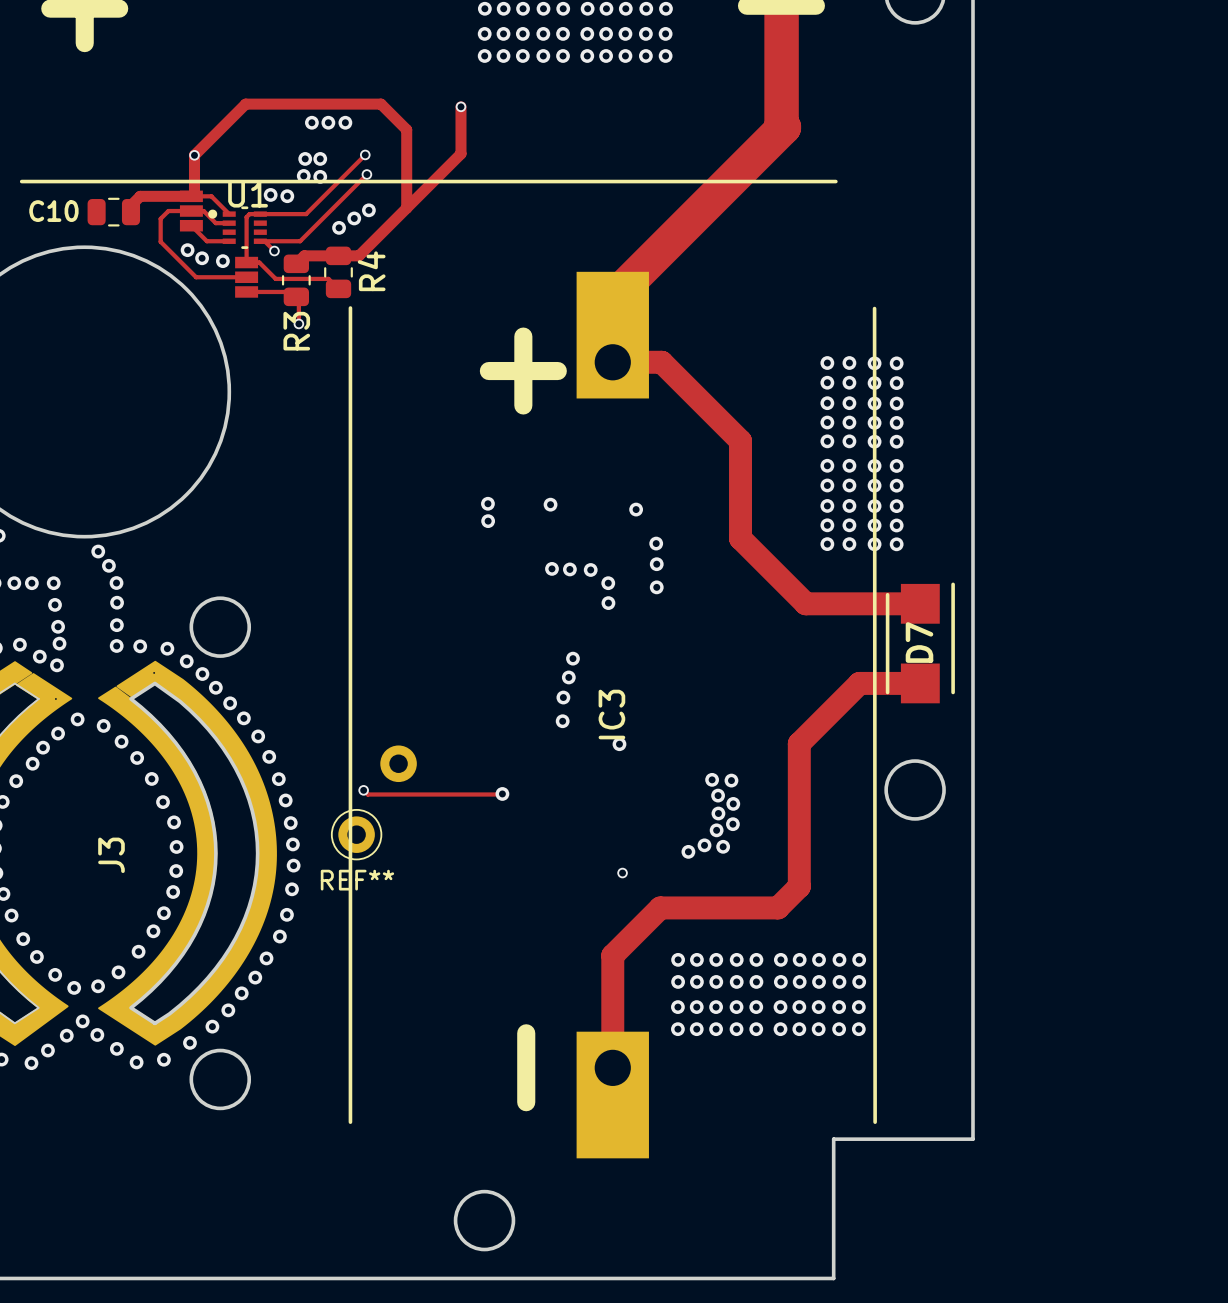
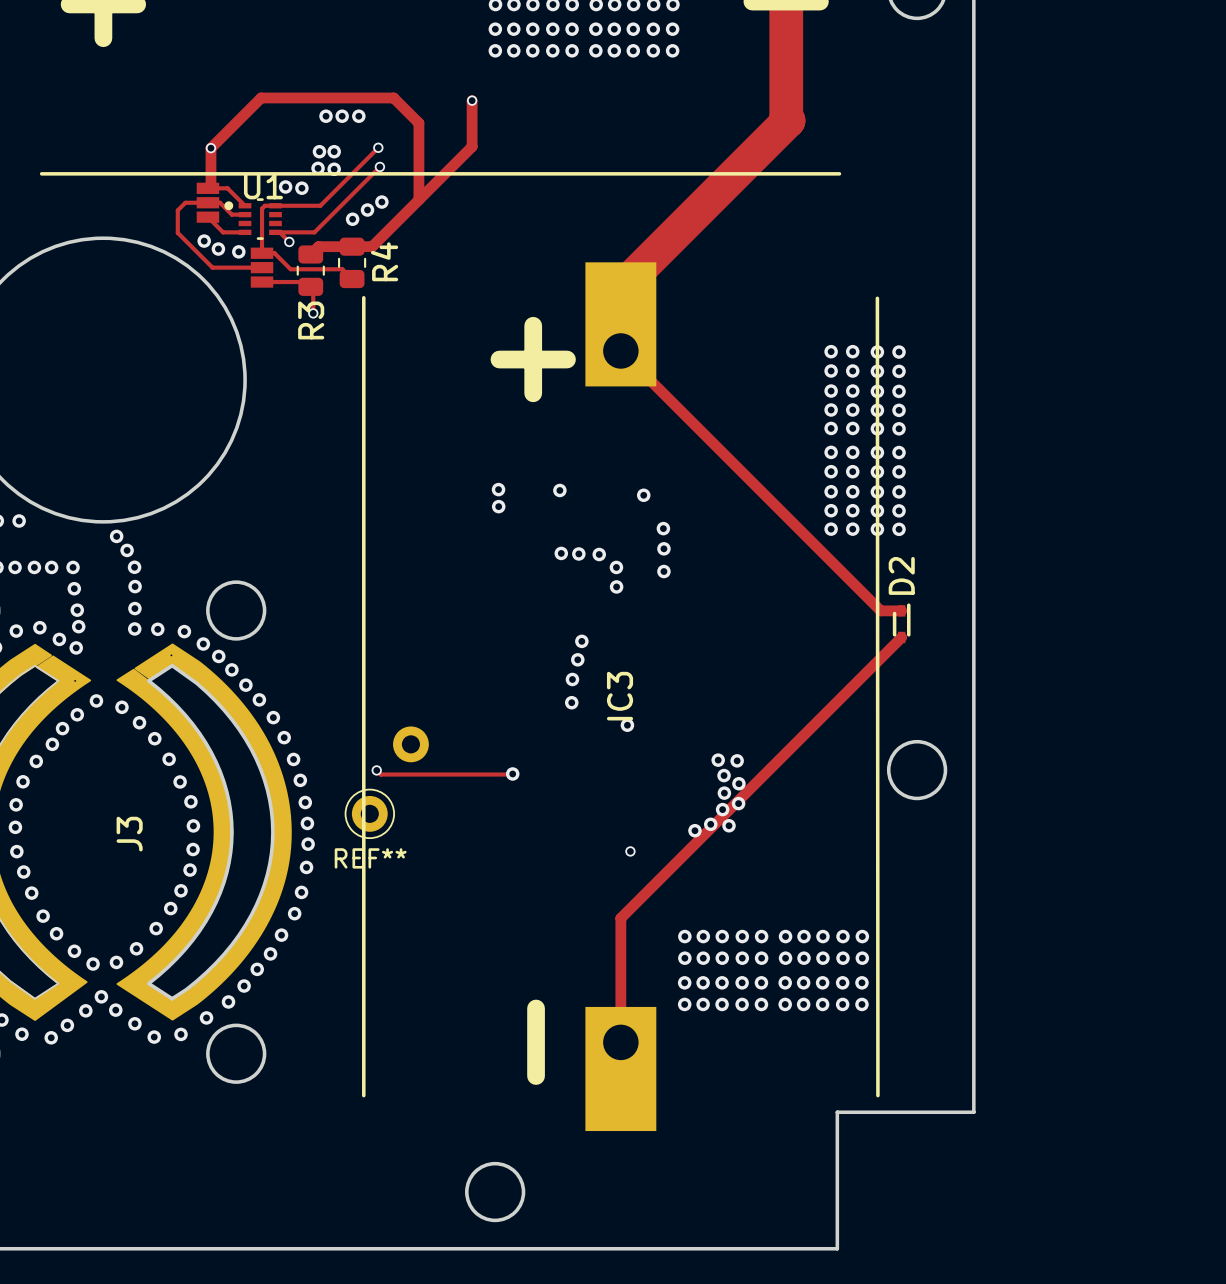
track: (191, 196) (140, 196) (130, 205) (130, 211) -> none
C10: (113, 212) -> none
track: (612, 362) (661, 362) (740, 440) (740, 538) (805, 603) (920, 603) -> (620, 350) (880, 610) (901, 610)
D2: none -> (901, 623)
D7: (920, 642) -> none
track: (920, 683) (859, 683) (799, 743) (799, 886) (777, 907) (660, 907) (612, 955) -> (901, 637) (620, 918) (620, 932)
track width: thick (612, 955) (612, 1067) -> thin (620, 932) (620, 1042)

